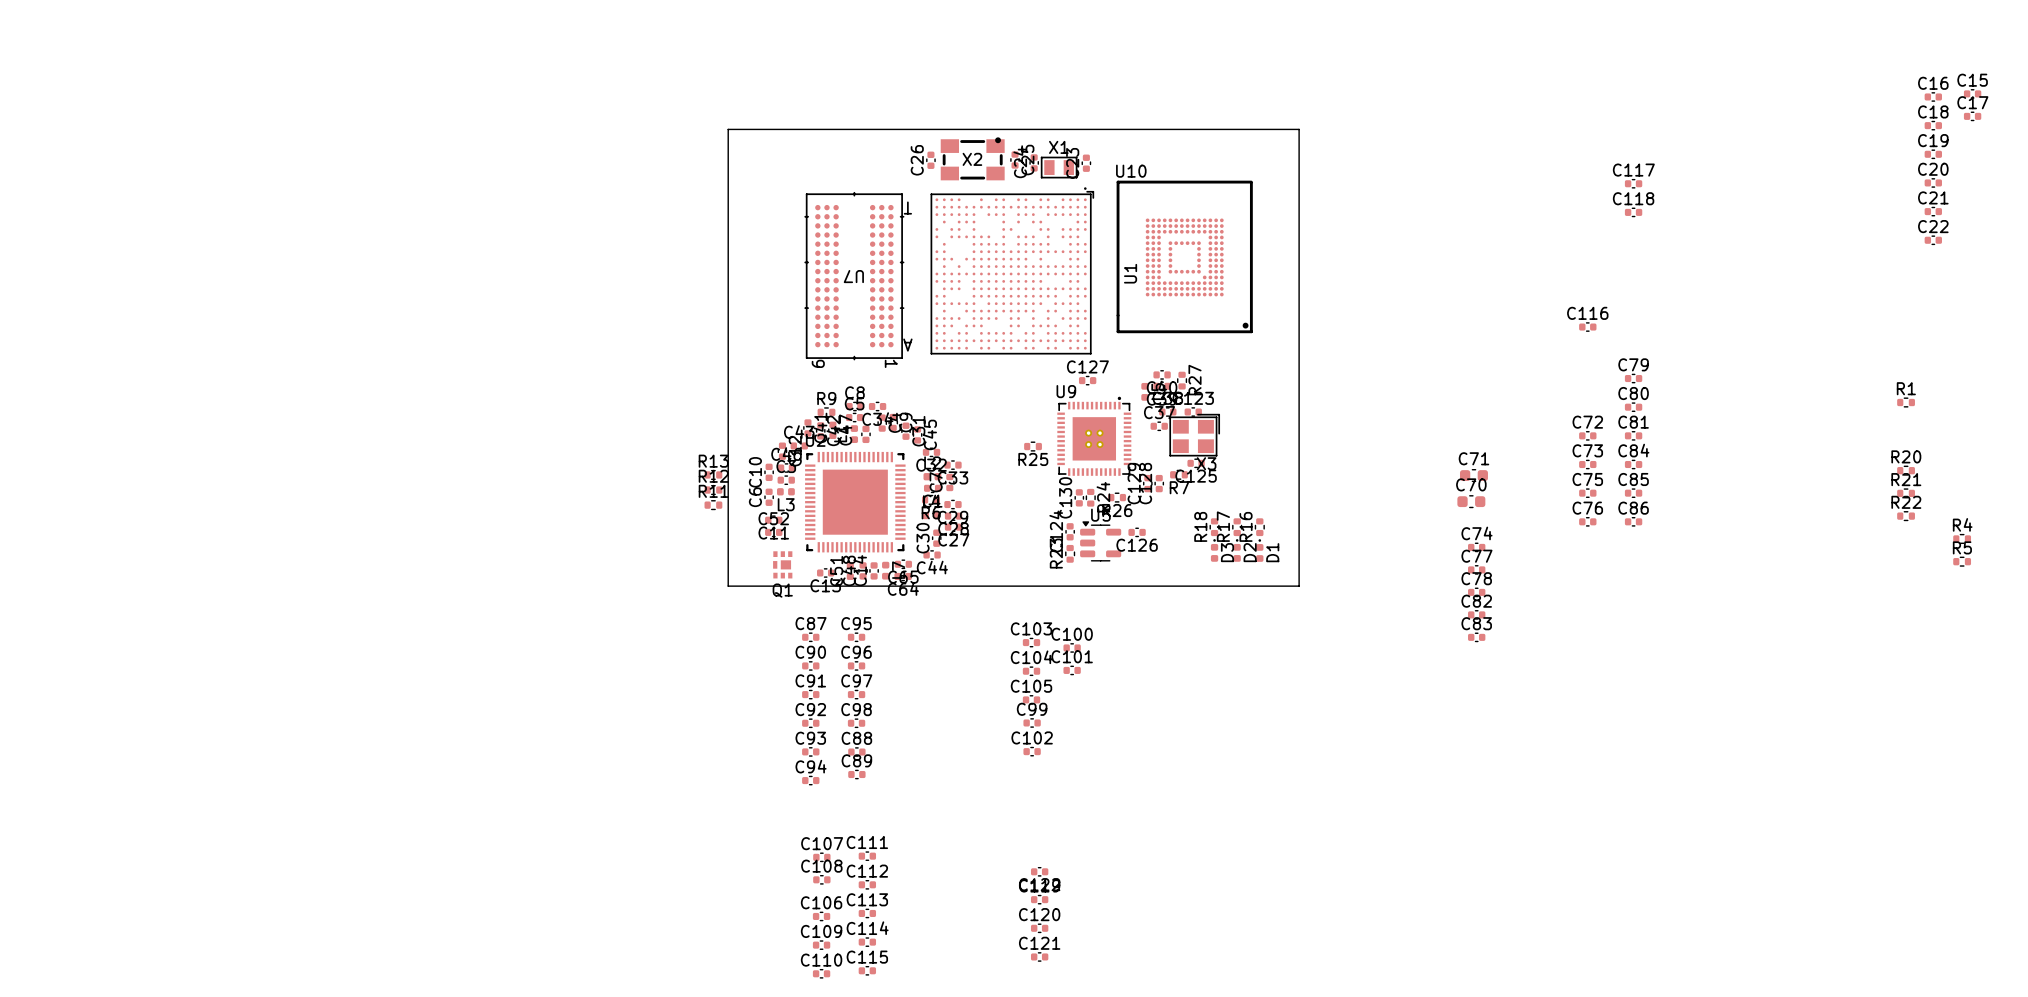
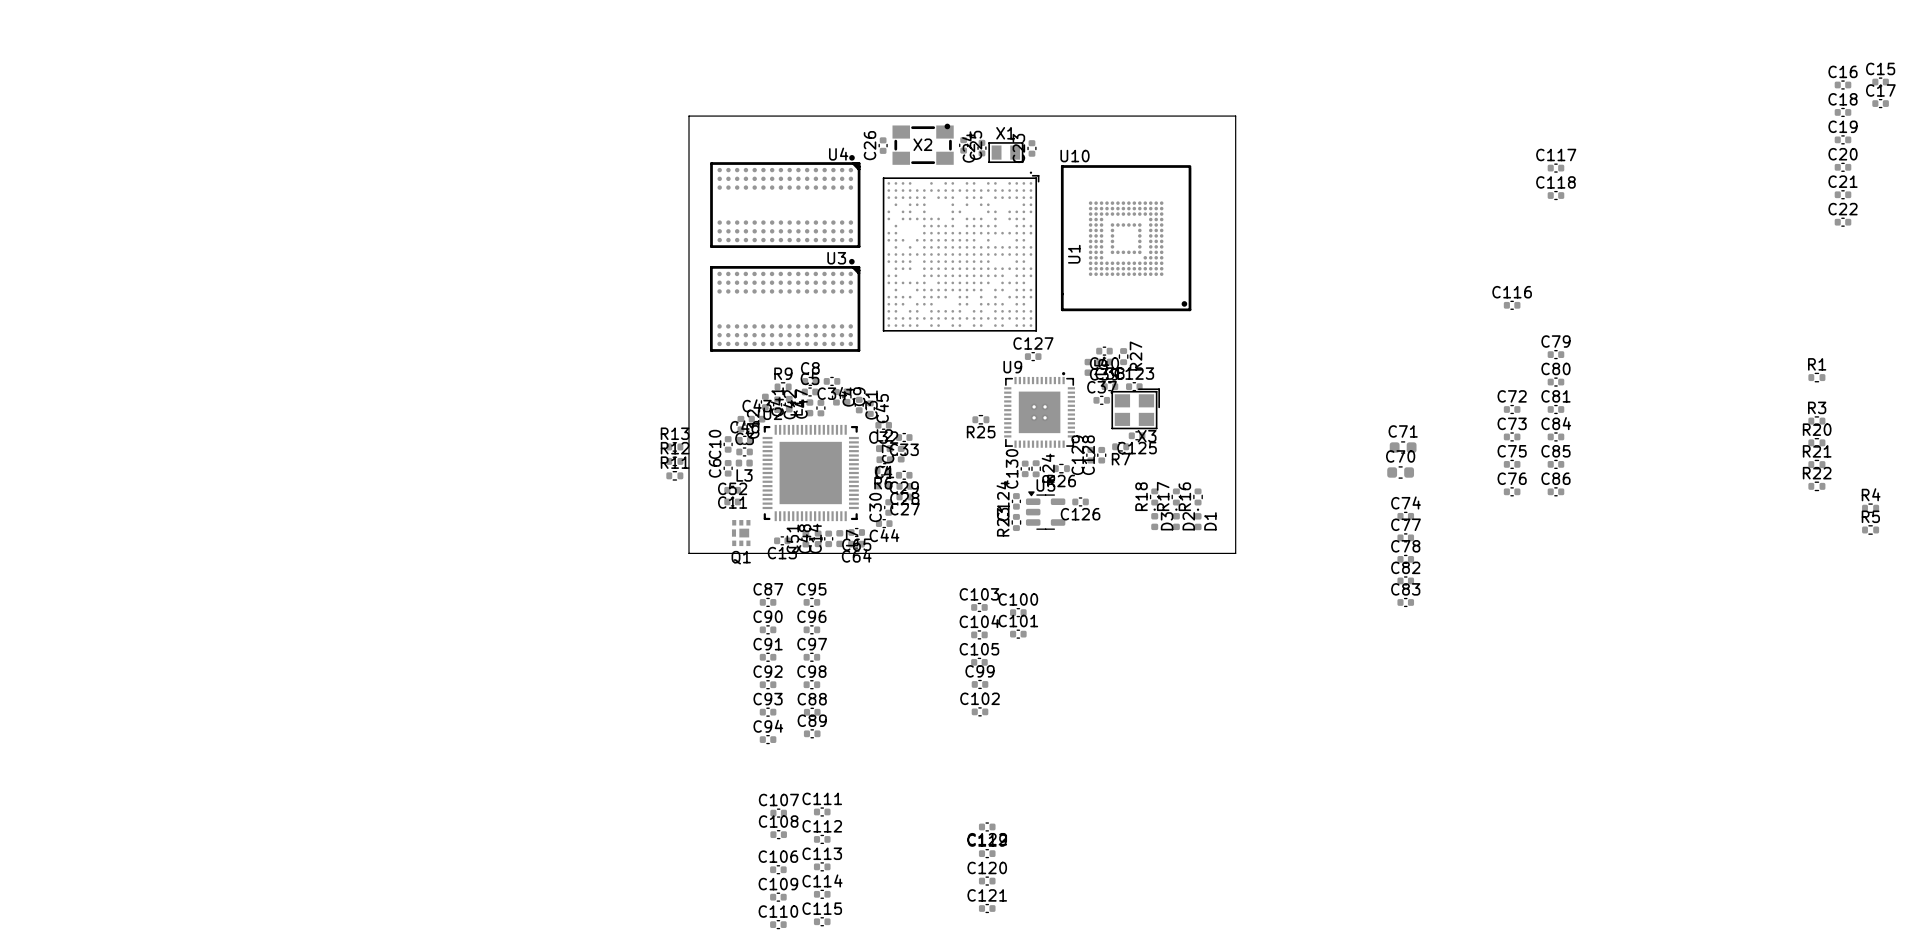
U4: none -> (785, 201)
U7: (854, 276) -> none
U3: none -> (785, 305)
R3: none -> (1816, 421)

